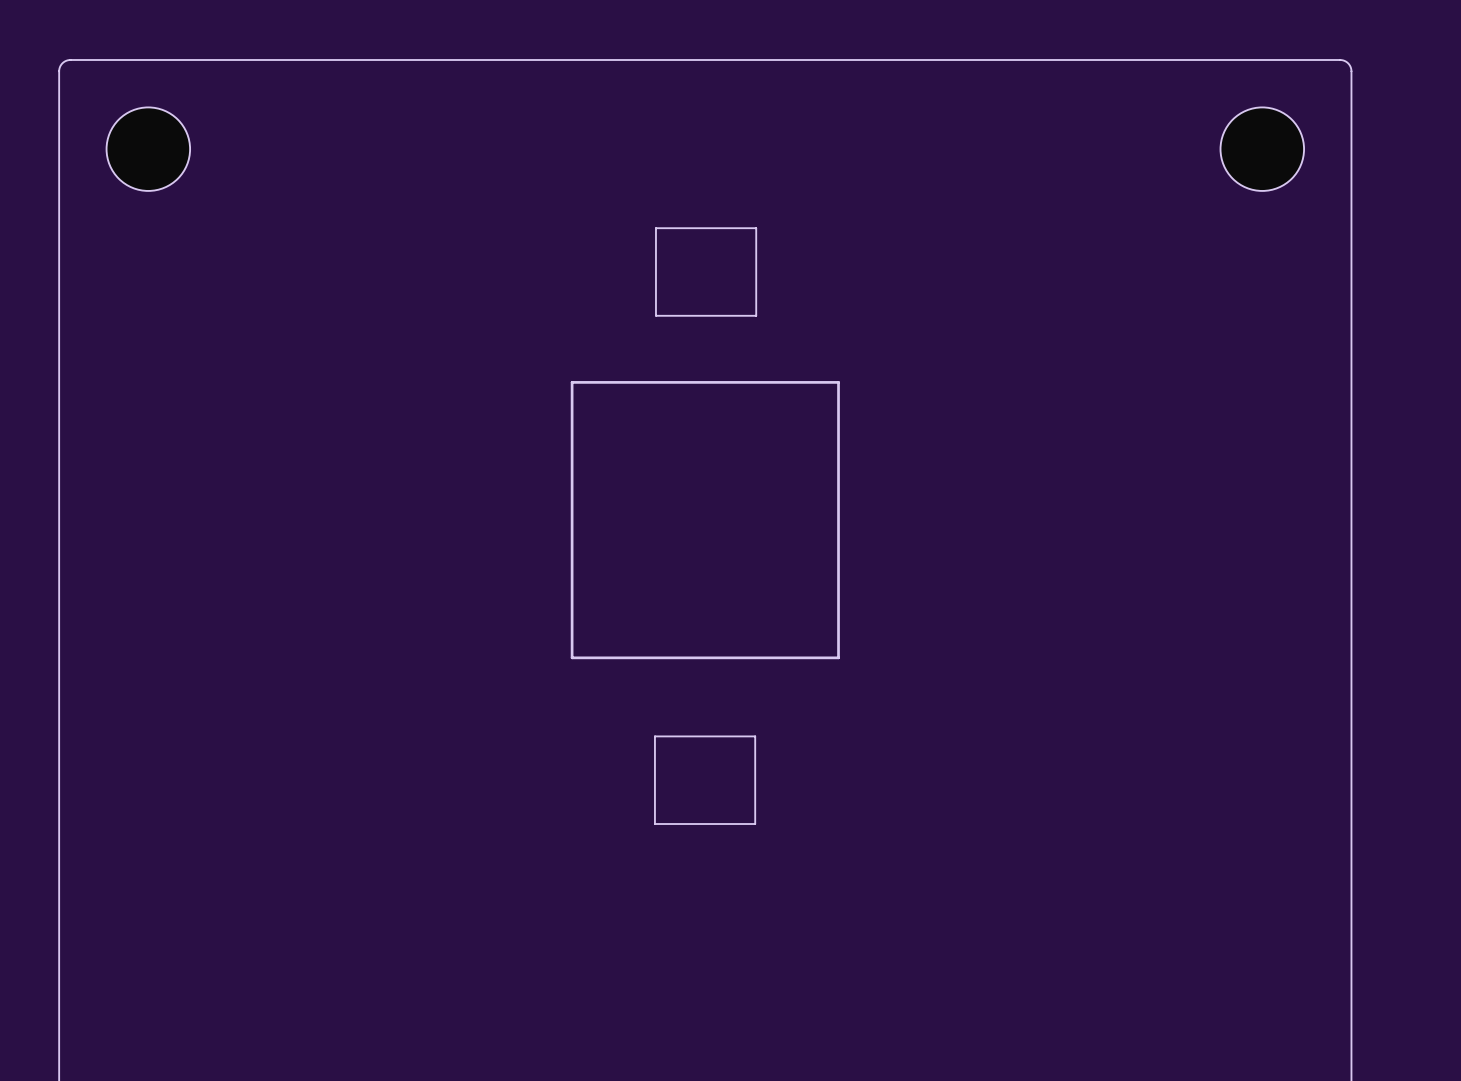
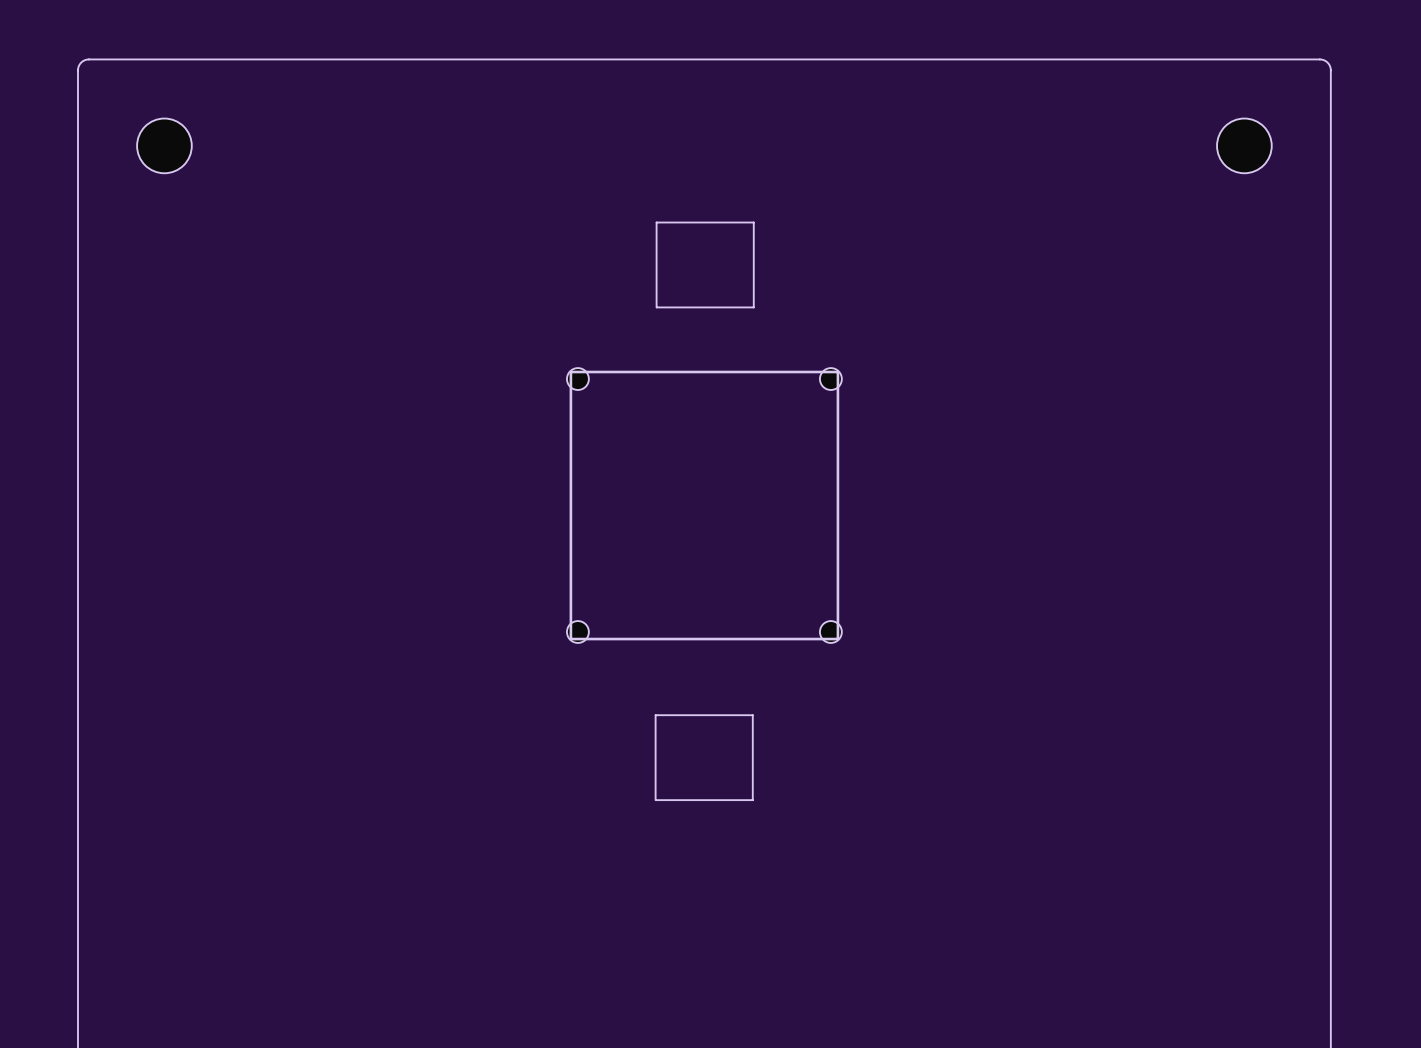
part footprint: [106, 107, 191, 191] -> [137, 118, 192, 174]
part footprint: [1220, 107, 1305, 191] -> [1217, 118, 1272, 174]
drawing: [570, 381, 840, 660] -> none
part: none -> (704, 505)

